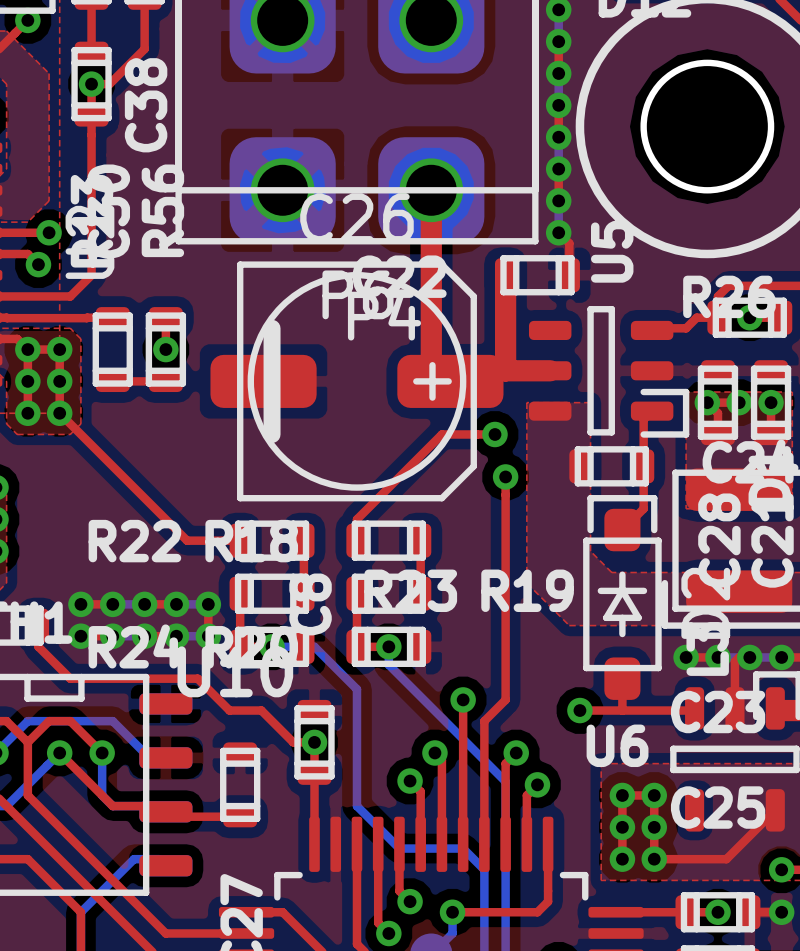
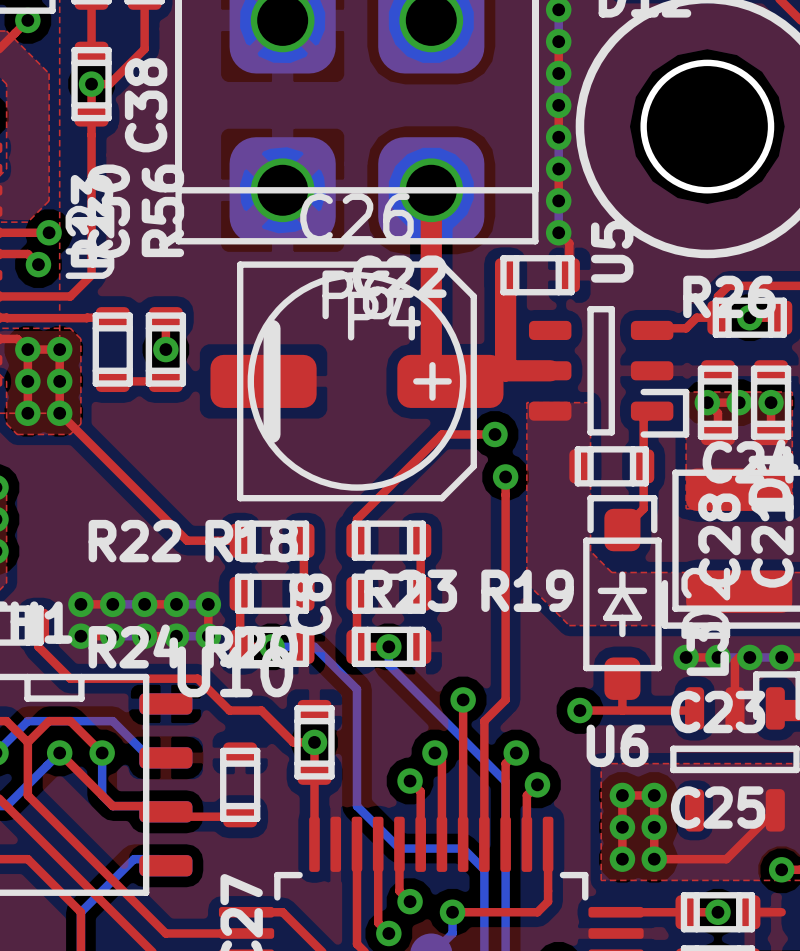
via: (781, 912) -> none

